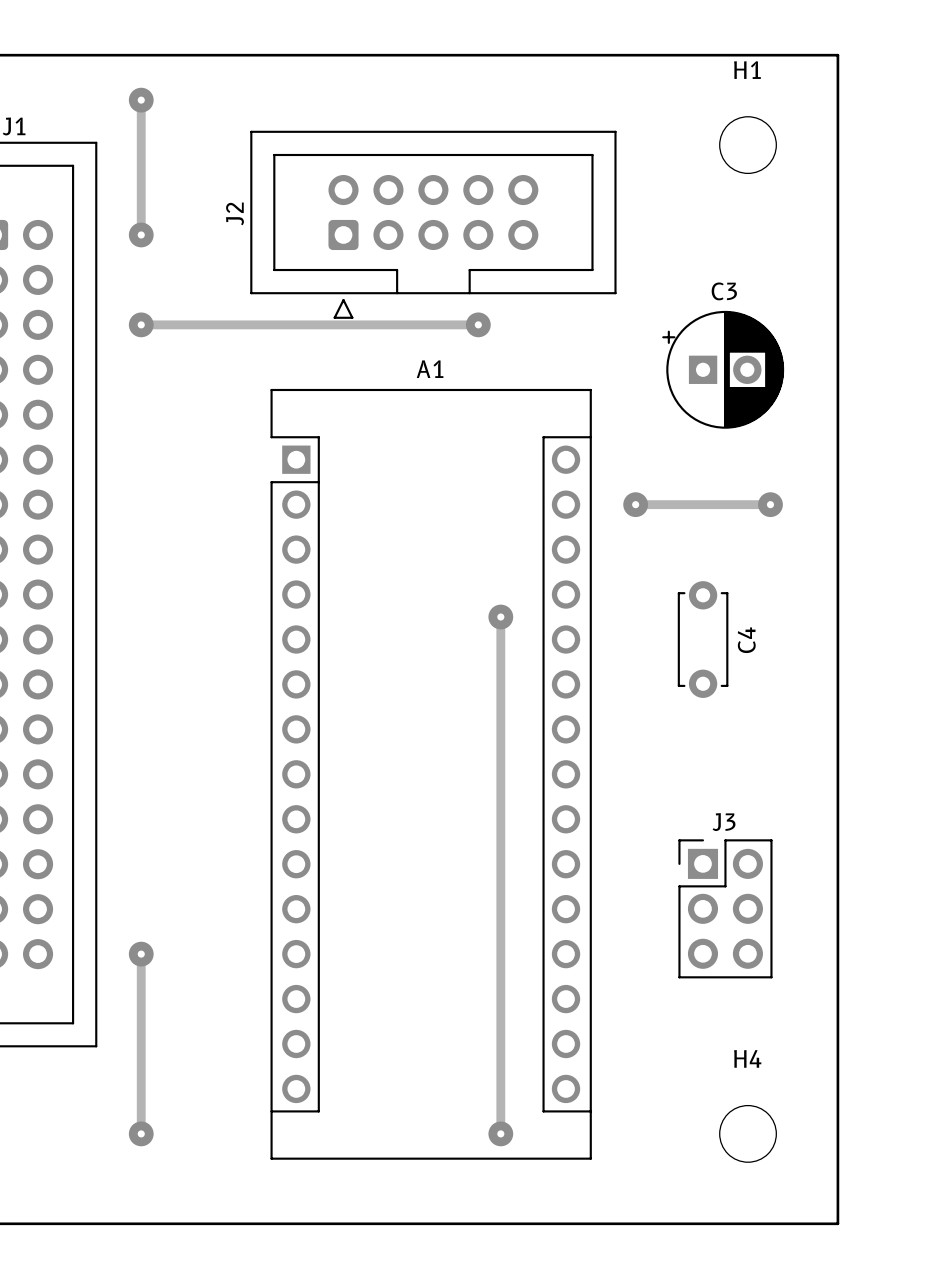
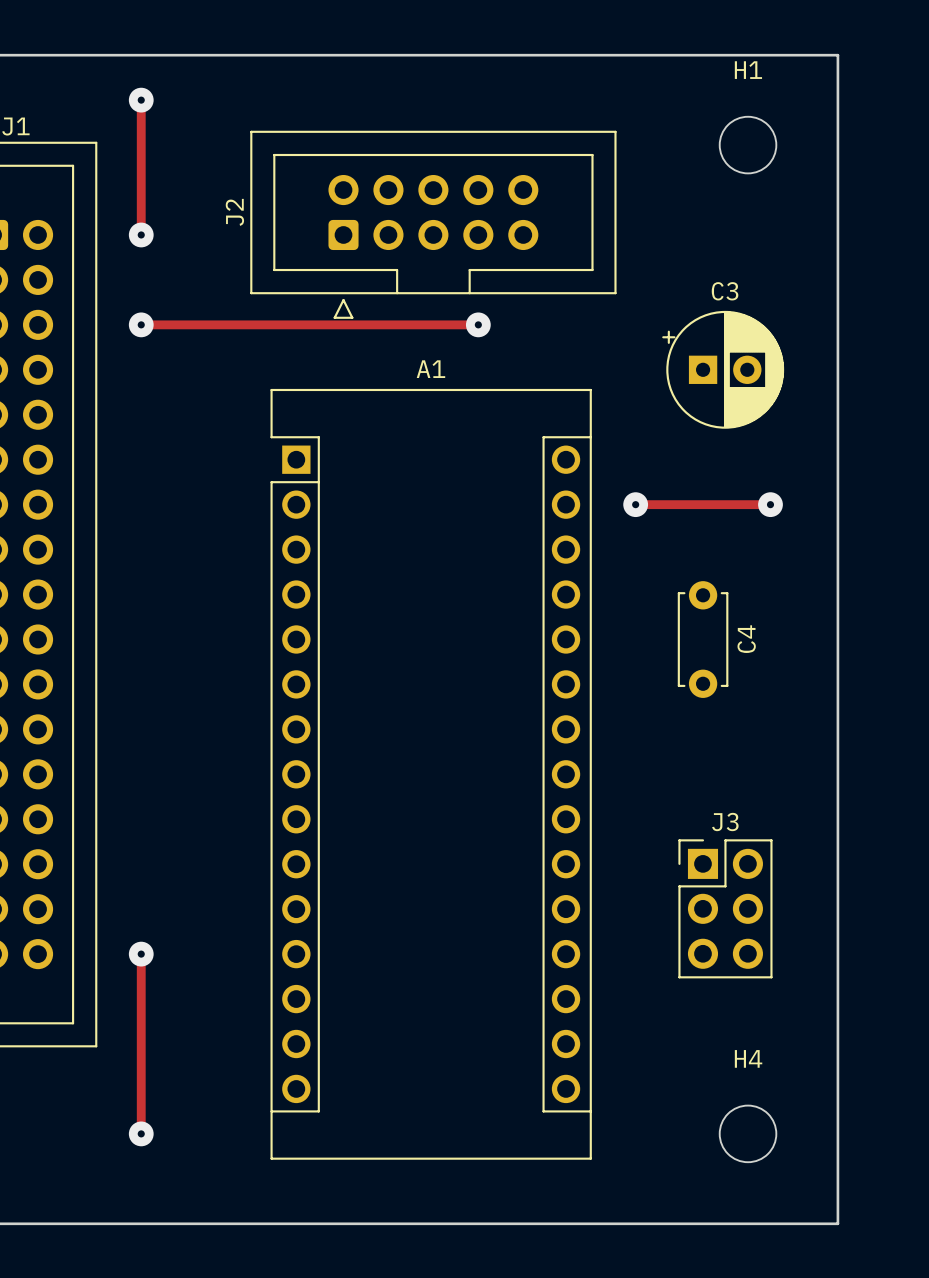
track: (500, 617) (500, 1133) -> none
via: (500, 617) -> none
via: (500, 1133) -> none

